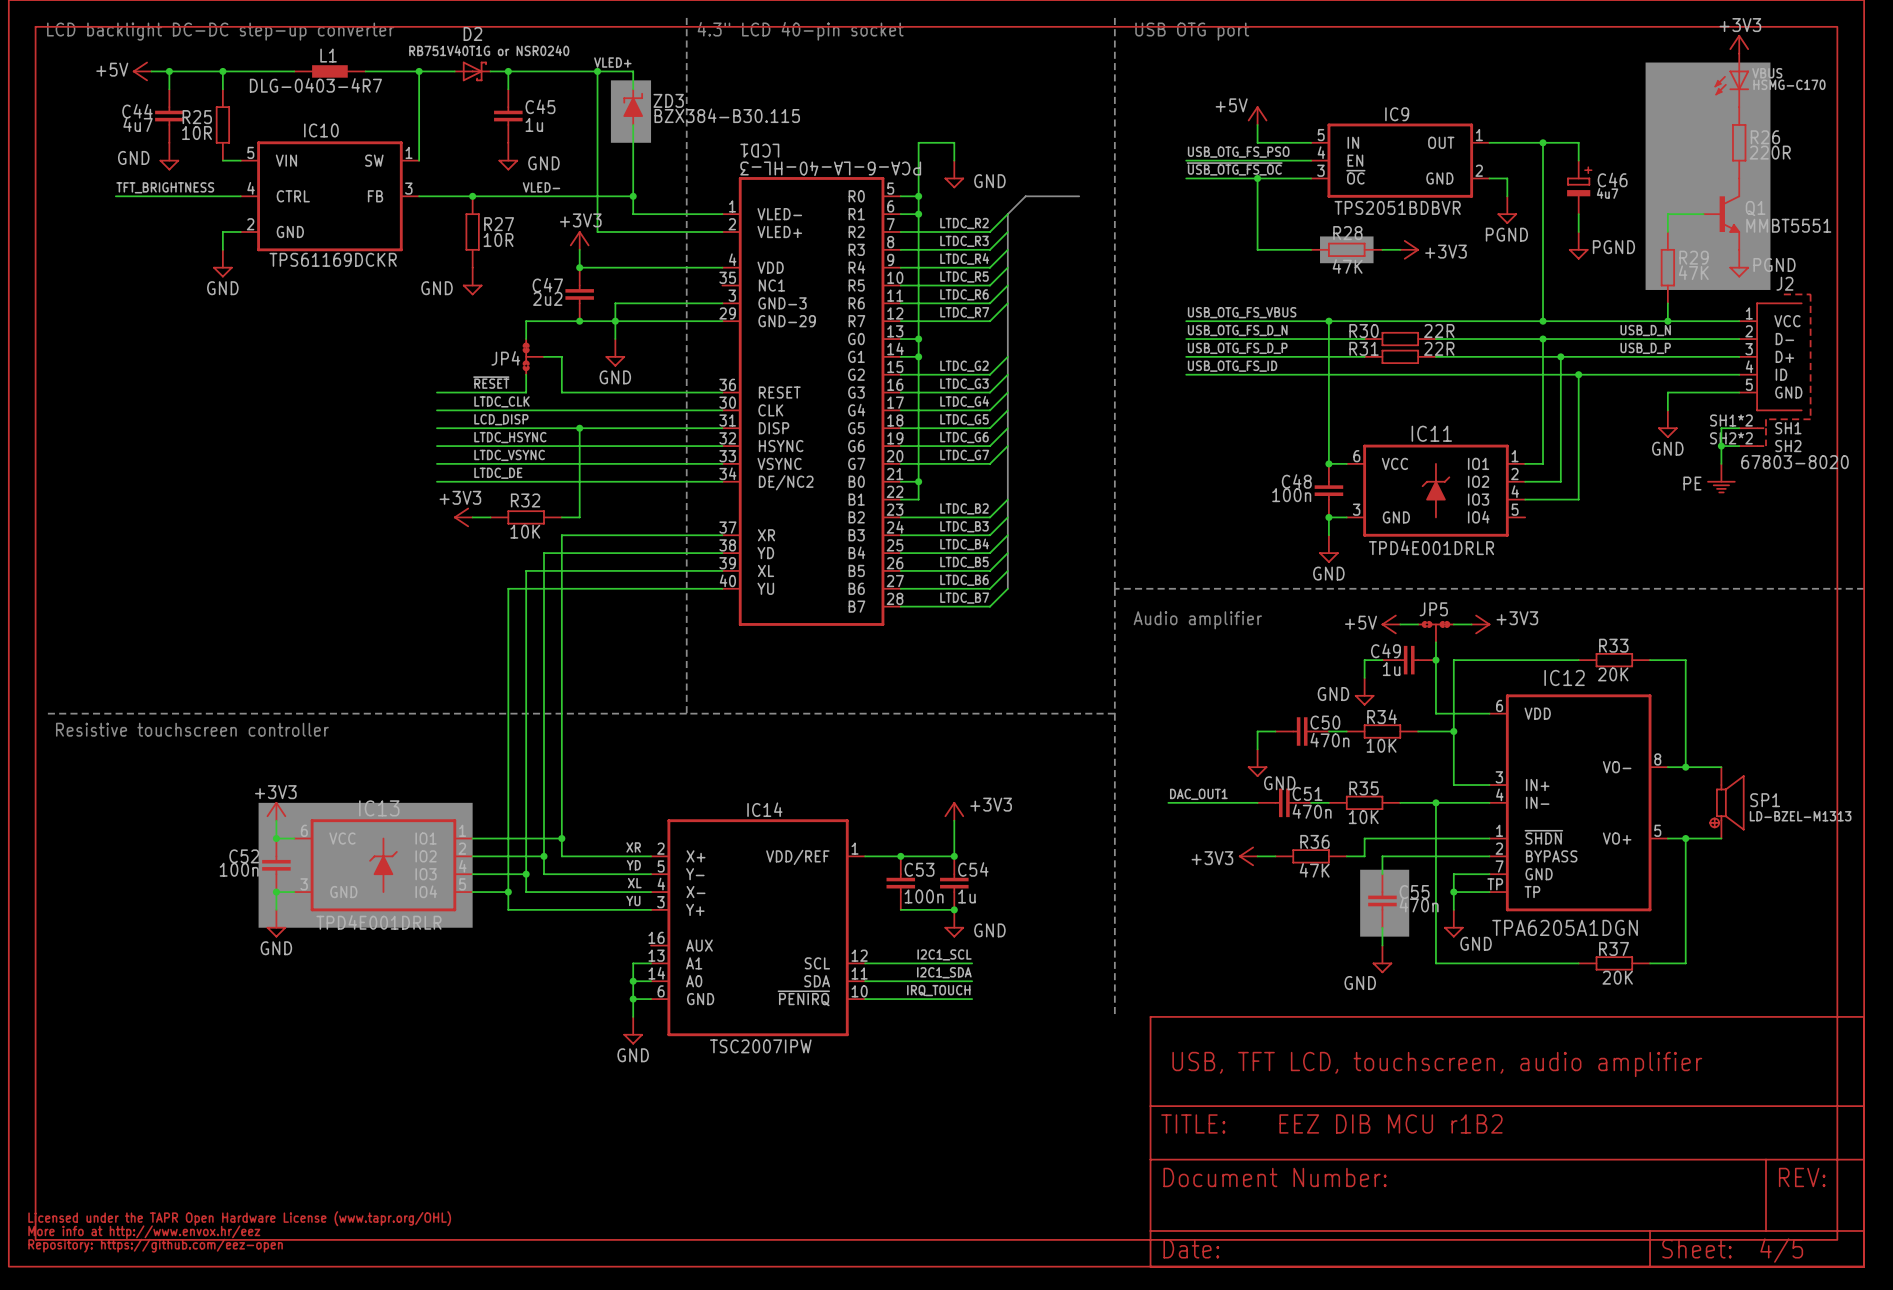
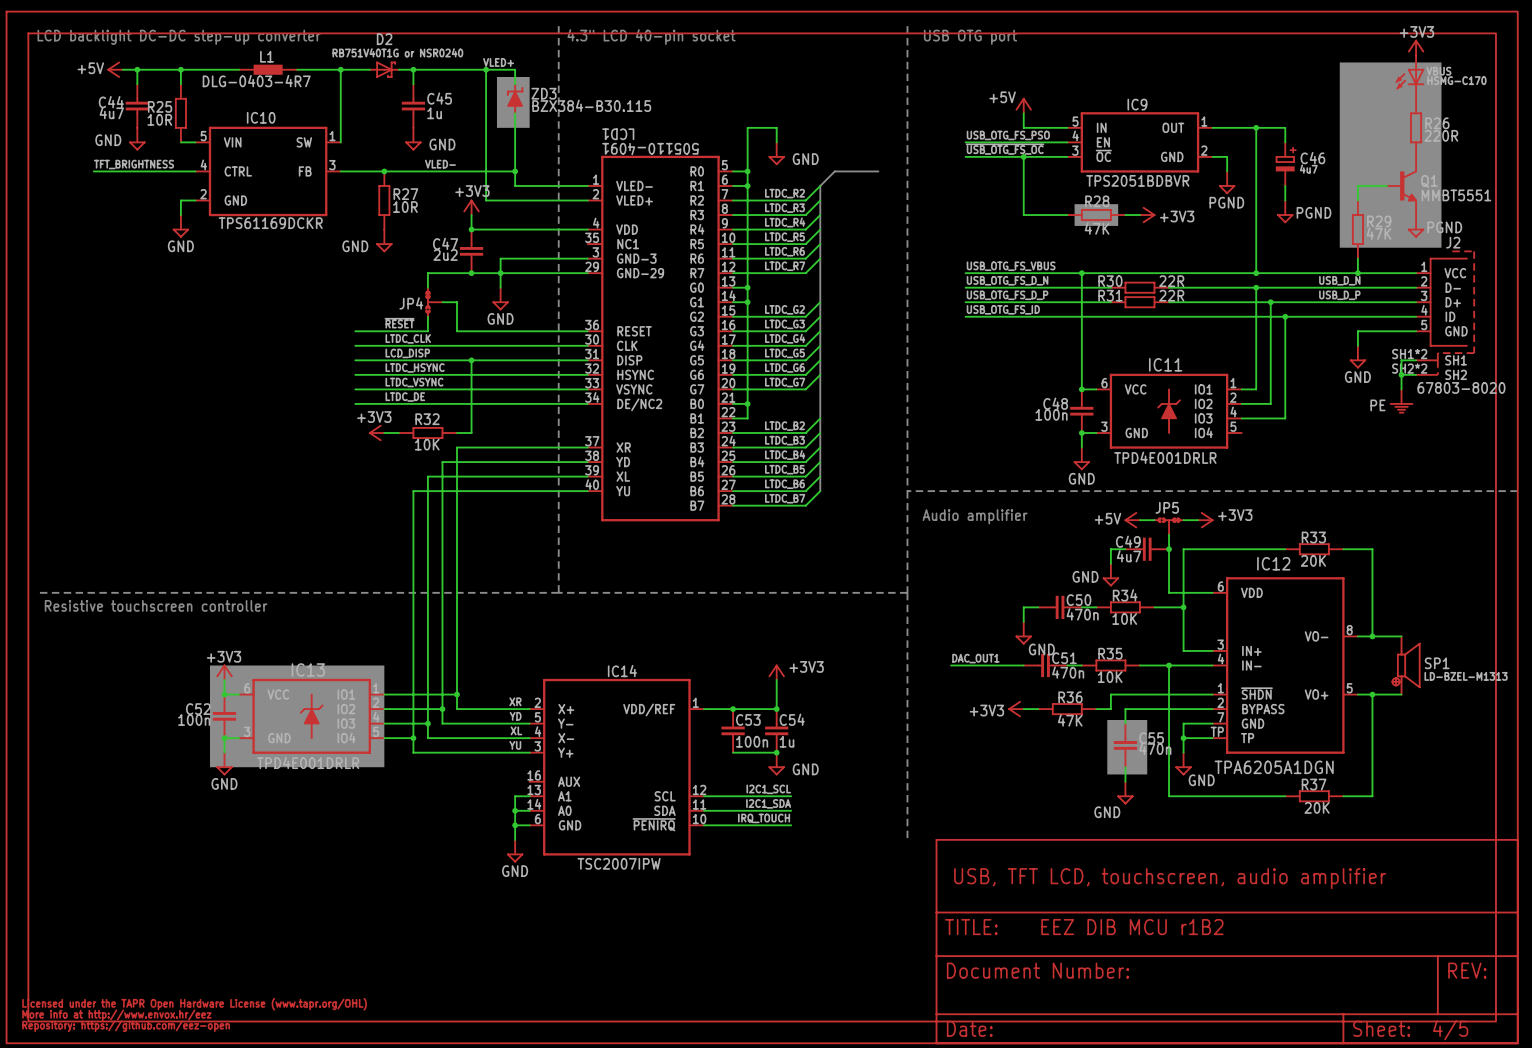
LCD1 value: PCA-6-LA-40-HL-3 (830, 168) -> 505110-4091 (650, 149)
C49 value: 1u (1391, 669) -> 4u7 (1128, 556)

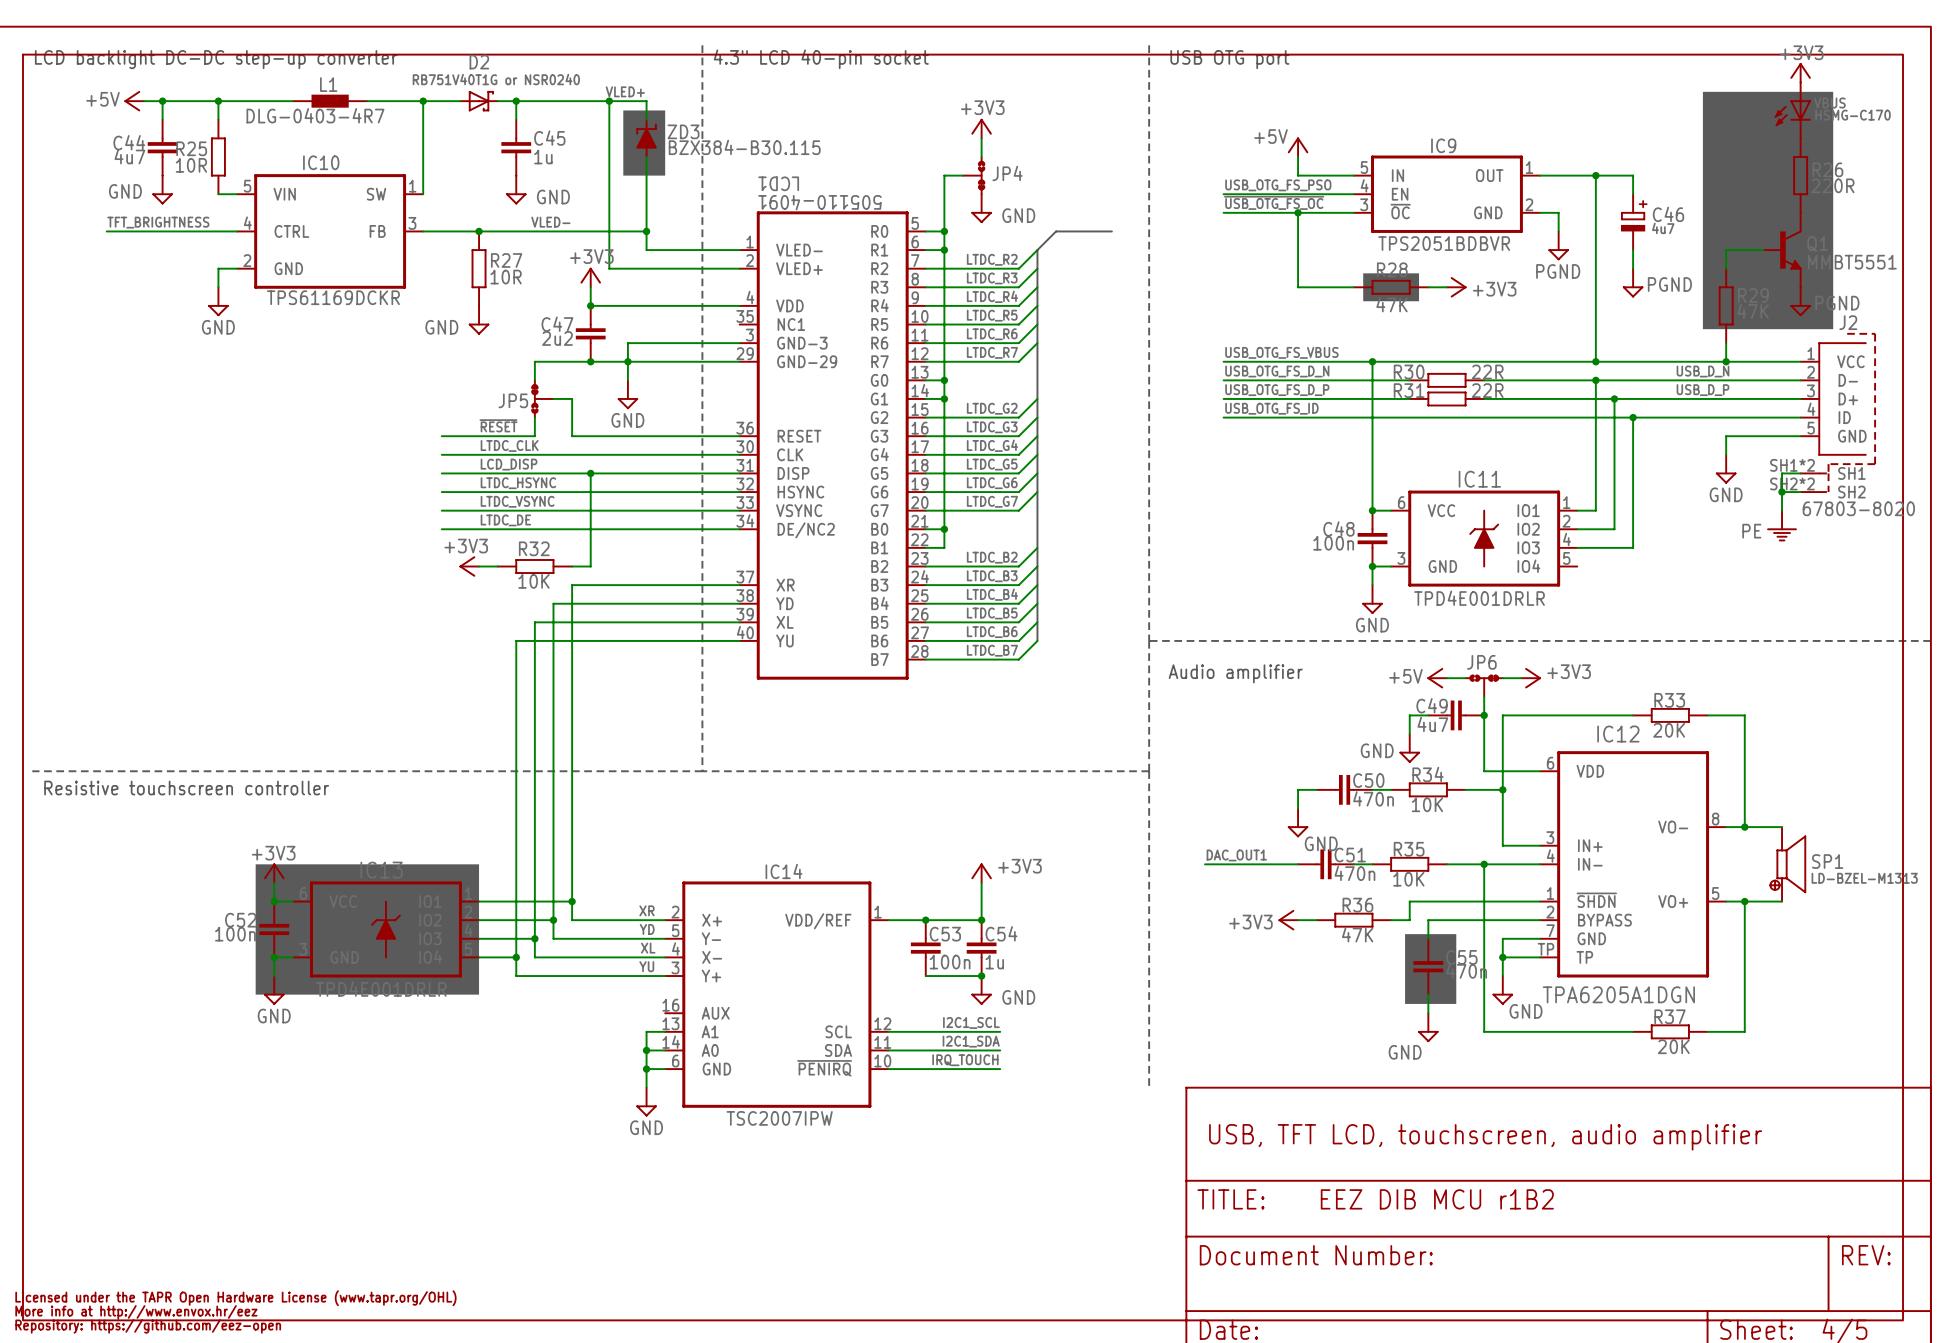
power symbol: none -> +3V3 (981, 128)
wire: none -> (981, 138) (981, 157)
JP4: none -> (974, 175)
JP4 name: JP4 (411, 303) -> JP5 (513, 400)
JP5 name: JP5 (1167, 507) -> JP6 (1481, 662)

